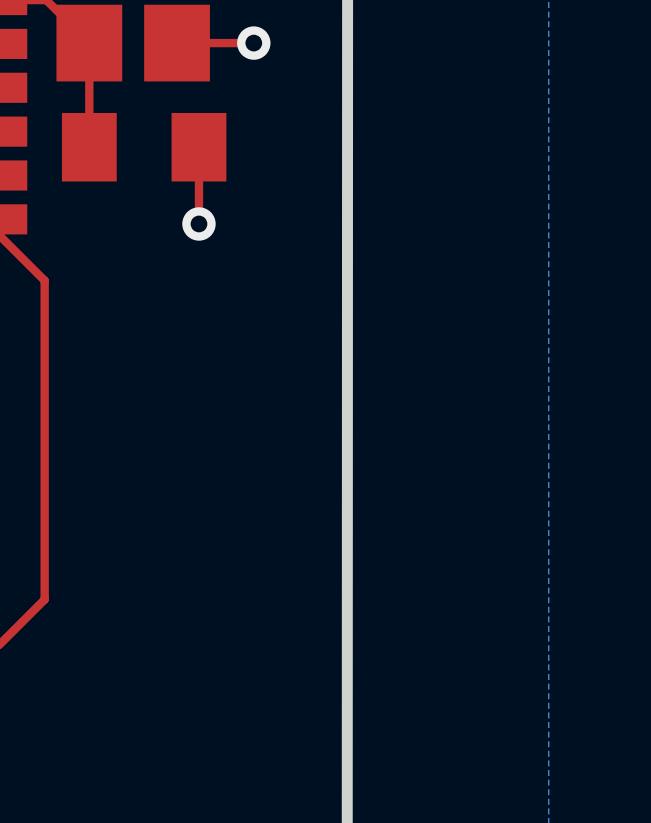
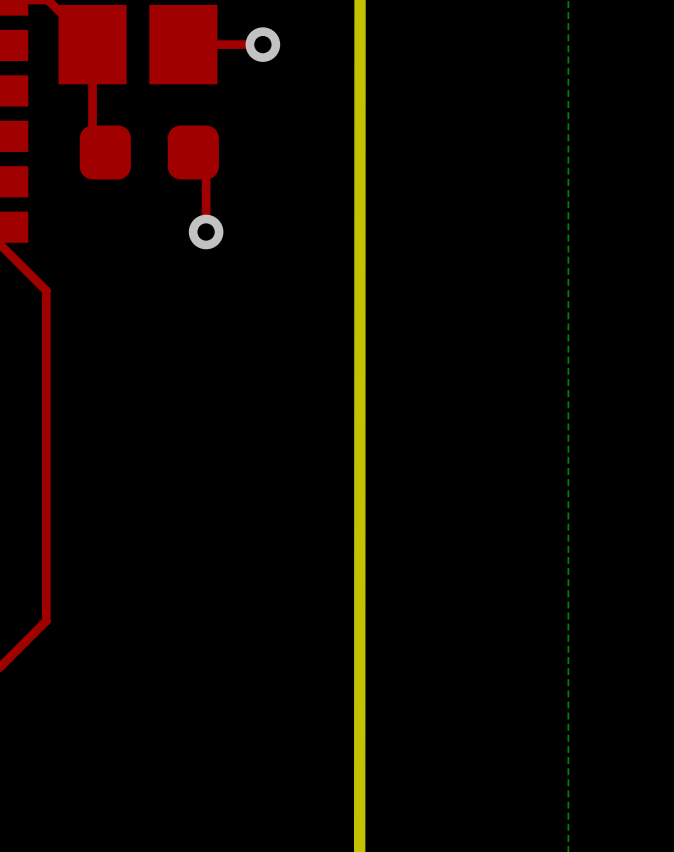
part footprint: [61, 112, 227, 182] -> [79, 125, 219, 180]

